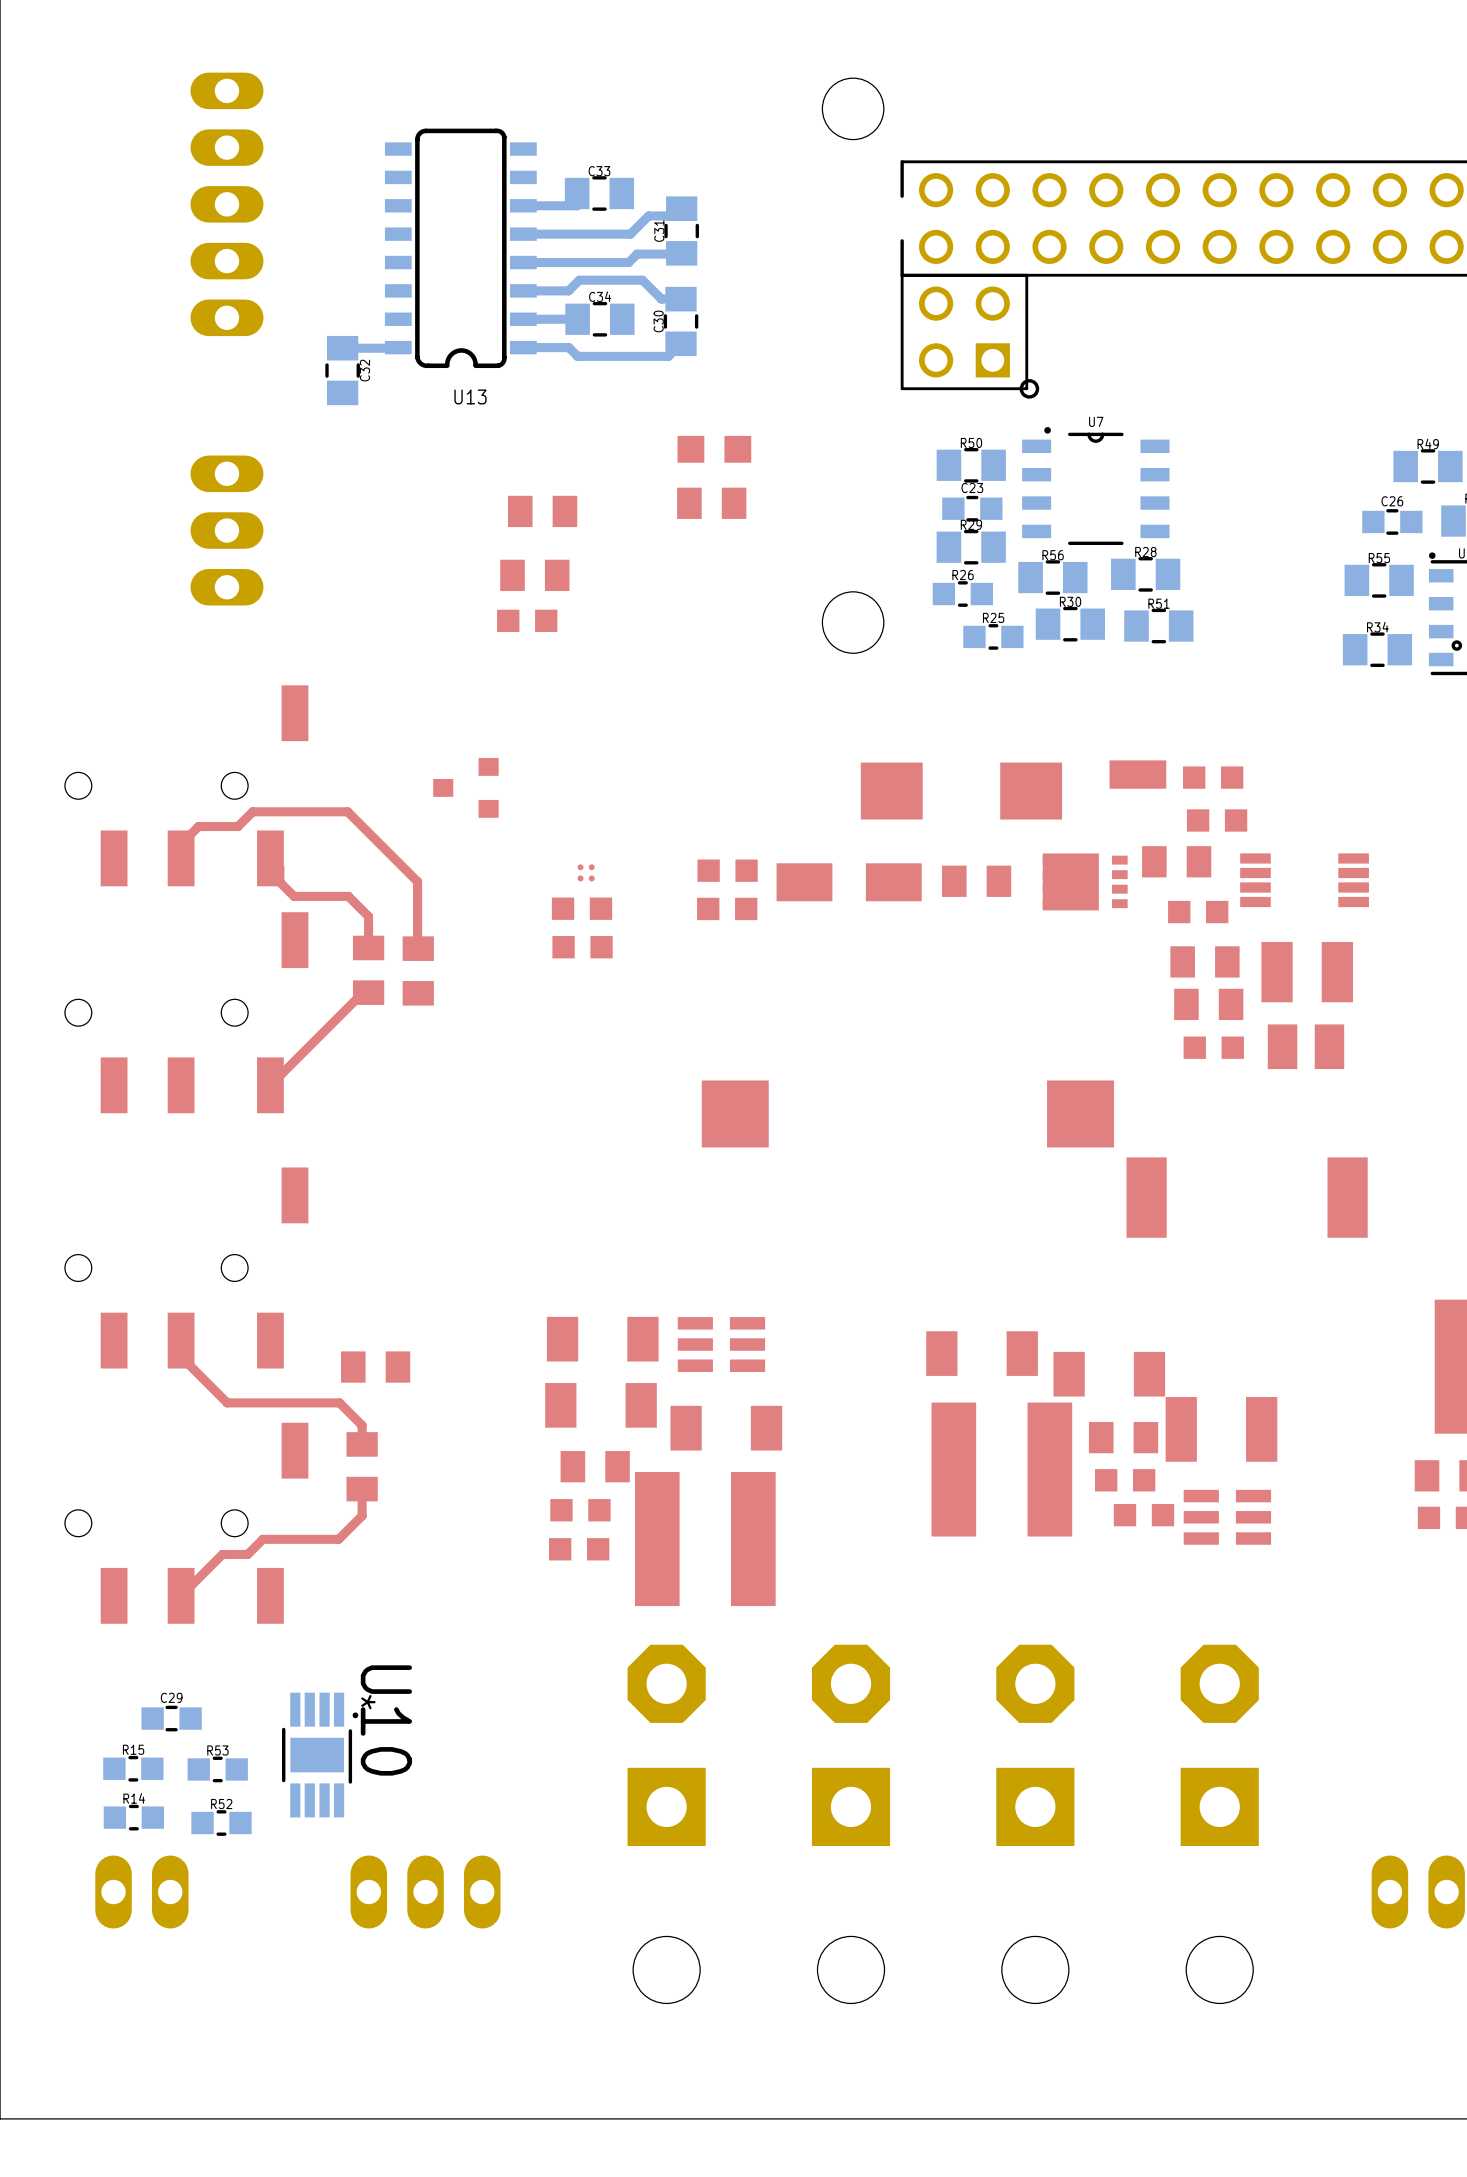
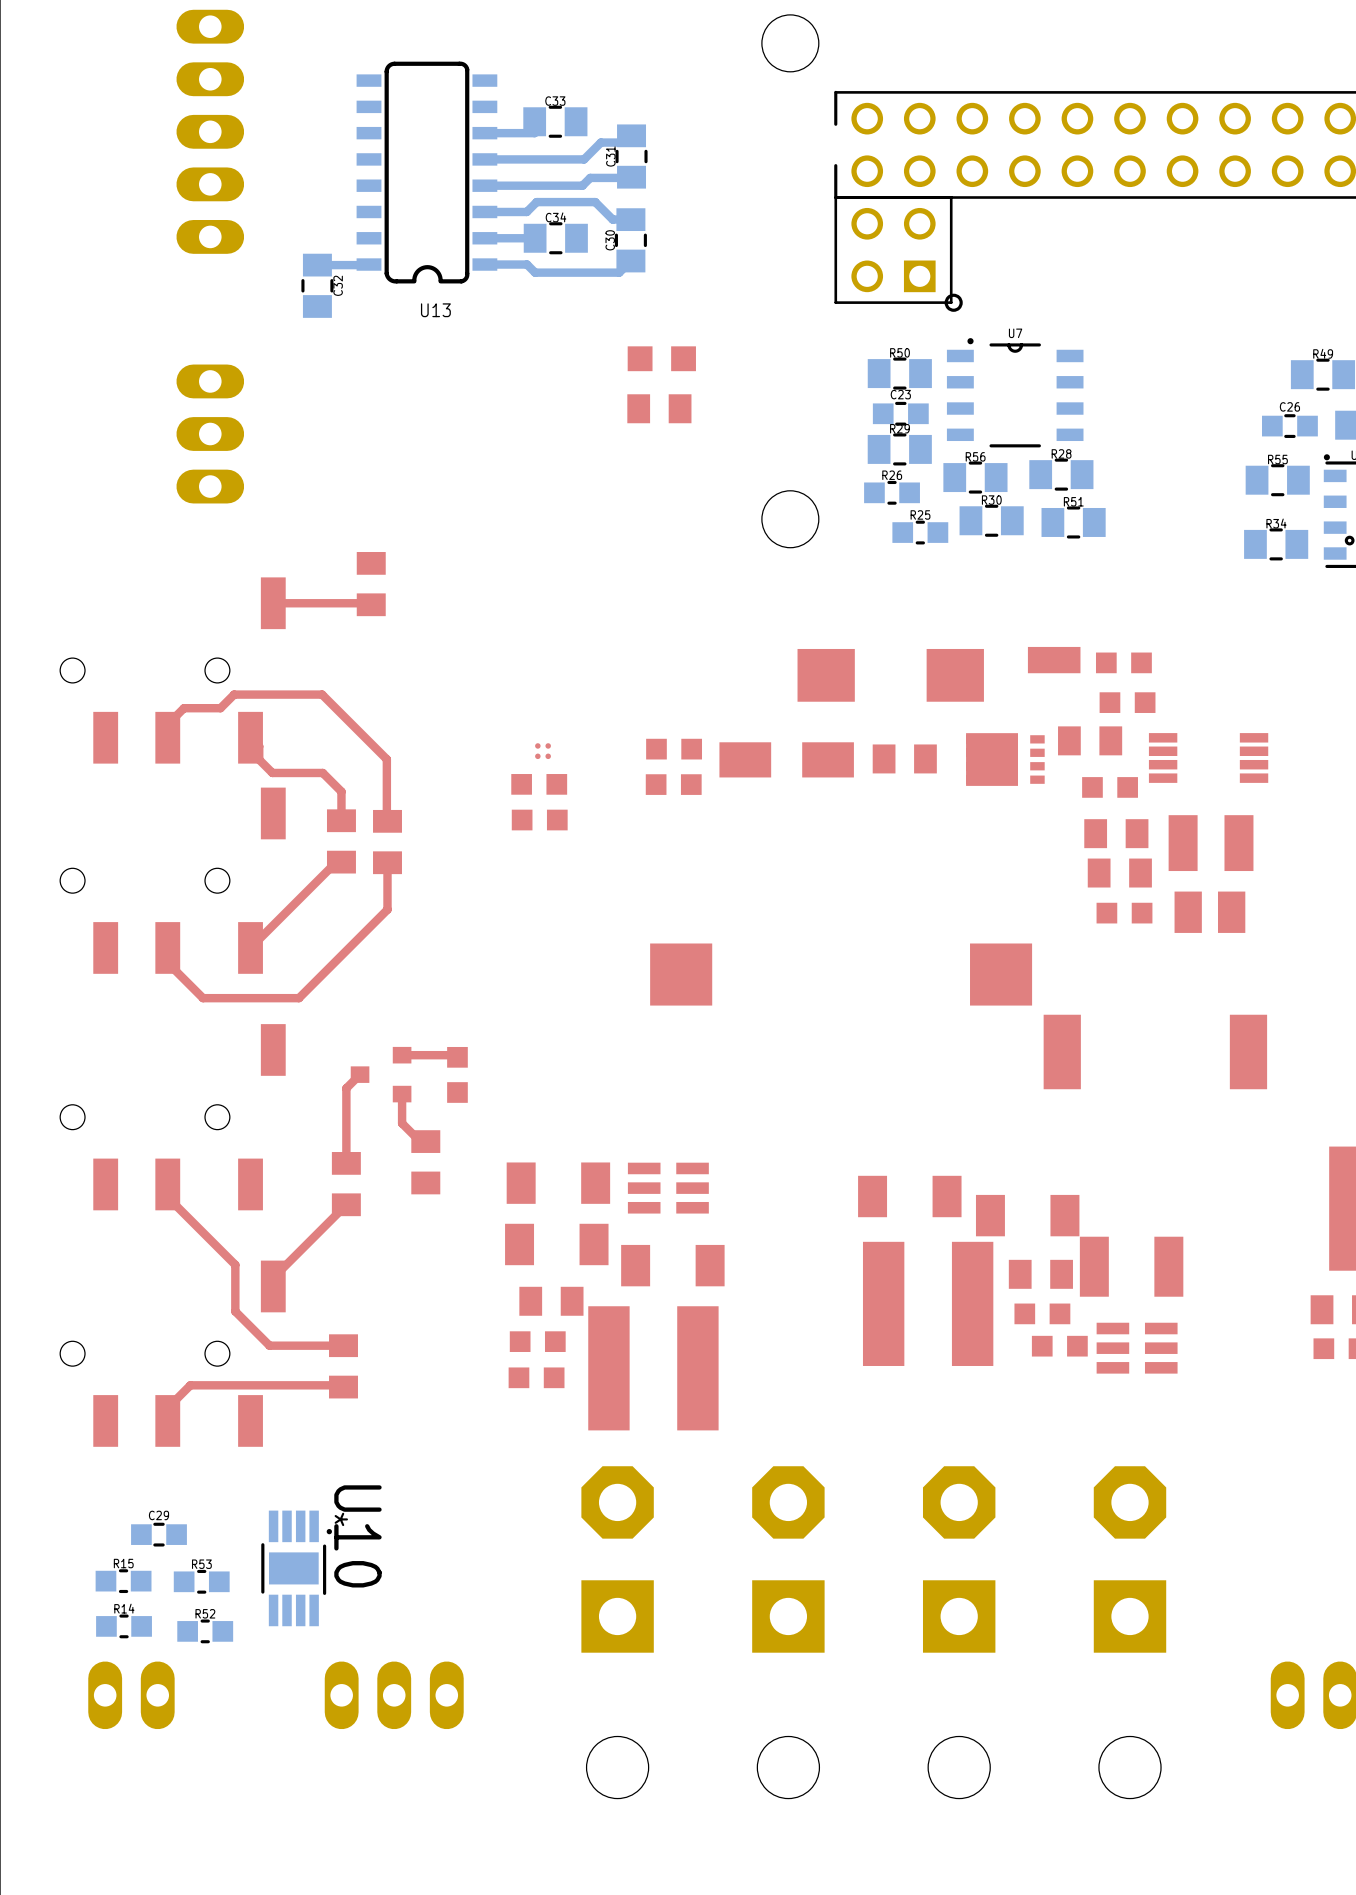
part: (542, 511) -> none
part: (534, 575) -> none
part: (527, 620) -> none
part: none -> (371, 584)
top track: none -> (273, 603) (371, 604)
part position: (465, 787) -> (381, 1074)
top track: none -> (387, 862) (387, 909) (298, 998) (203, 998) (168, 963) (167, 947)
top track: none -> (402, 1055) (455, 1055) (457, 1057)
top track: none -> (360, 1074) (346, 1088) (346, 1163)
part: none -> (457, 1074)
top track: none -> (402, 1094) (402, 1123) (415, 1137) (421, 1137) (425, 1141)
part: none -> (425, 1162)
top track: (185, 1345) (186, 1361) (227, 1402) (339, 1402) (362, 1425) (362, 1444) -> (171, 1188) (171, 1201) (235, 1264) (235, 1311) (269, 1345) (343, 1345)
top track: none -> (346, 1204) (273, 1277) (273, 1286)
part rotation: 0° (375, 1367) -> 90° clockwise (346, 1184)
part: (362, 1466) -> none
top track: (362, 1489) (362, 1515) (338, 1539) (262, 1539) (247, 1554) (222, 1554) (181, 1595) -> (343, 1387) (341, 1385) (190, 1385) (167, 1407) (167, 1420)
part: none -> (343, 1366)

